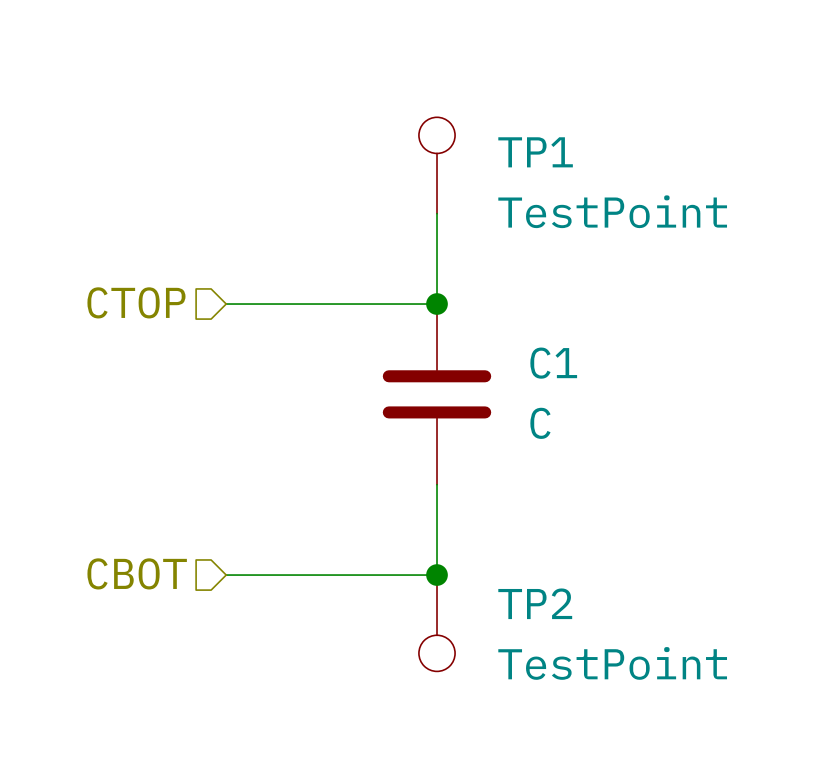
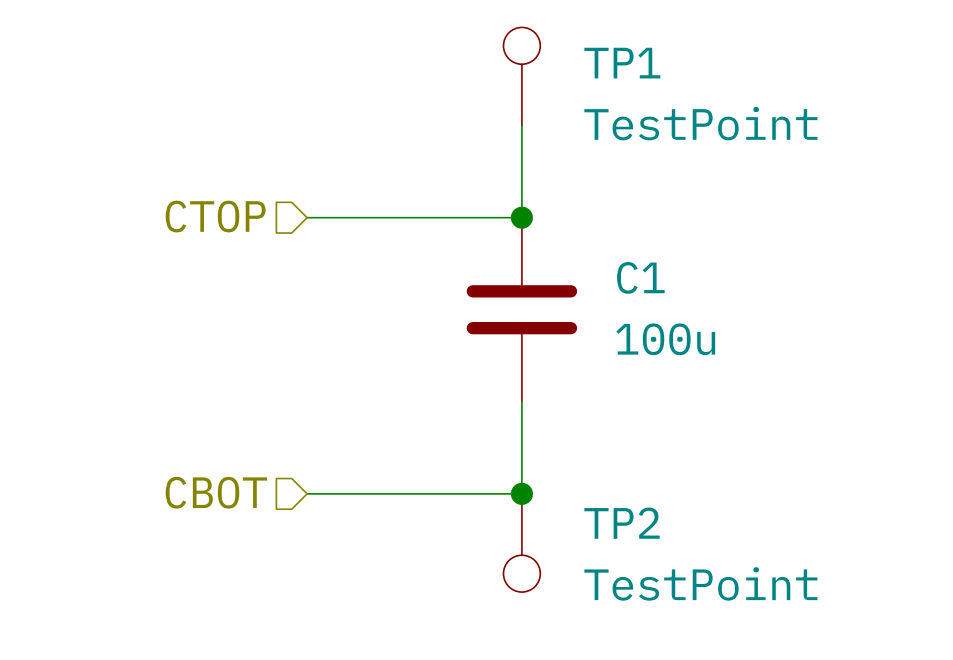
C1 value: C (540, 423) -> 100u (665, 339)

